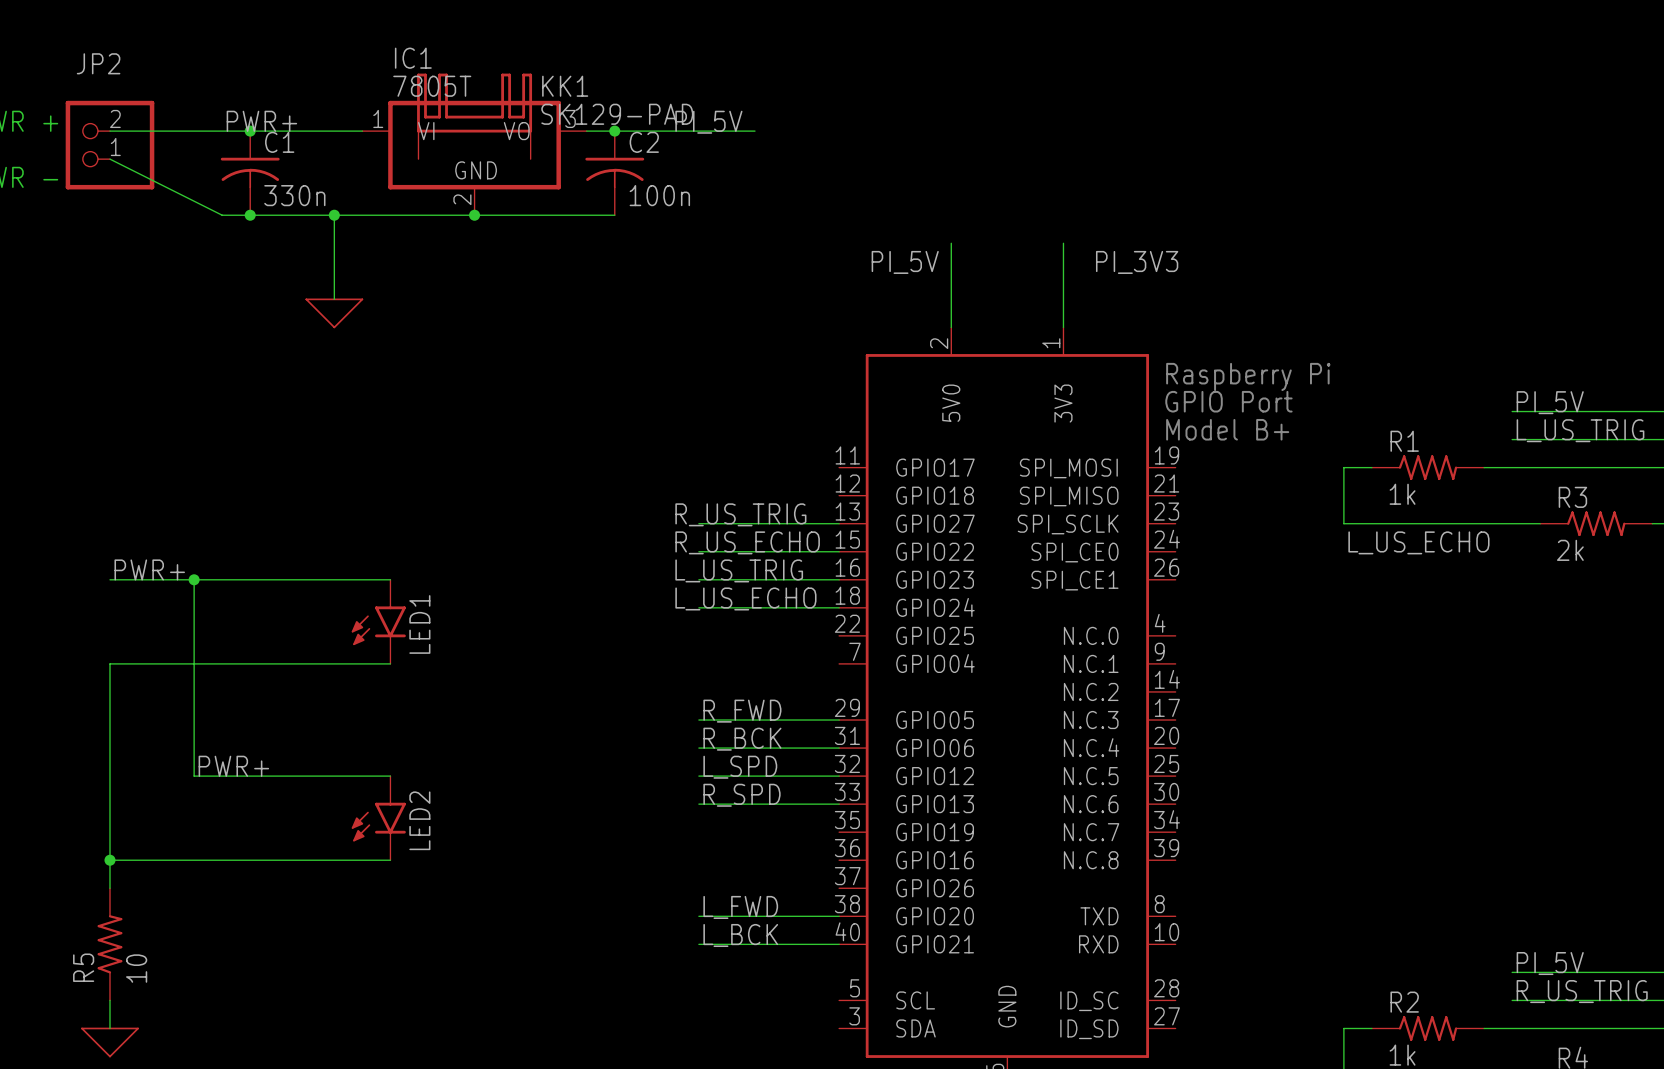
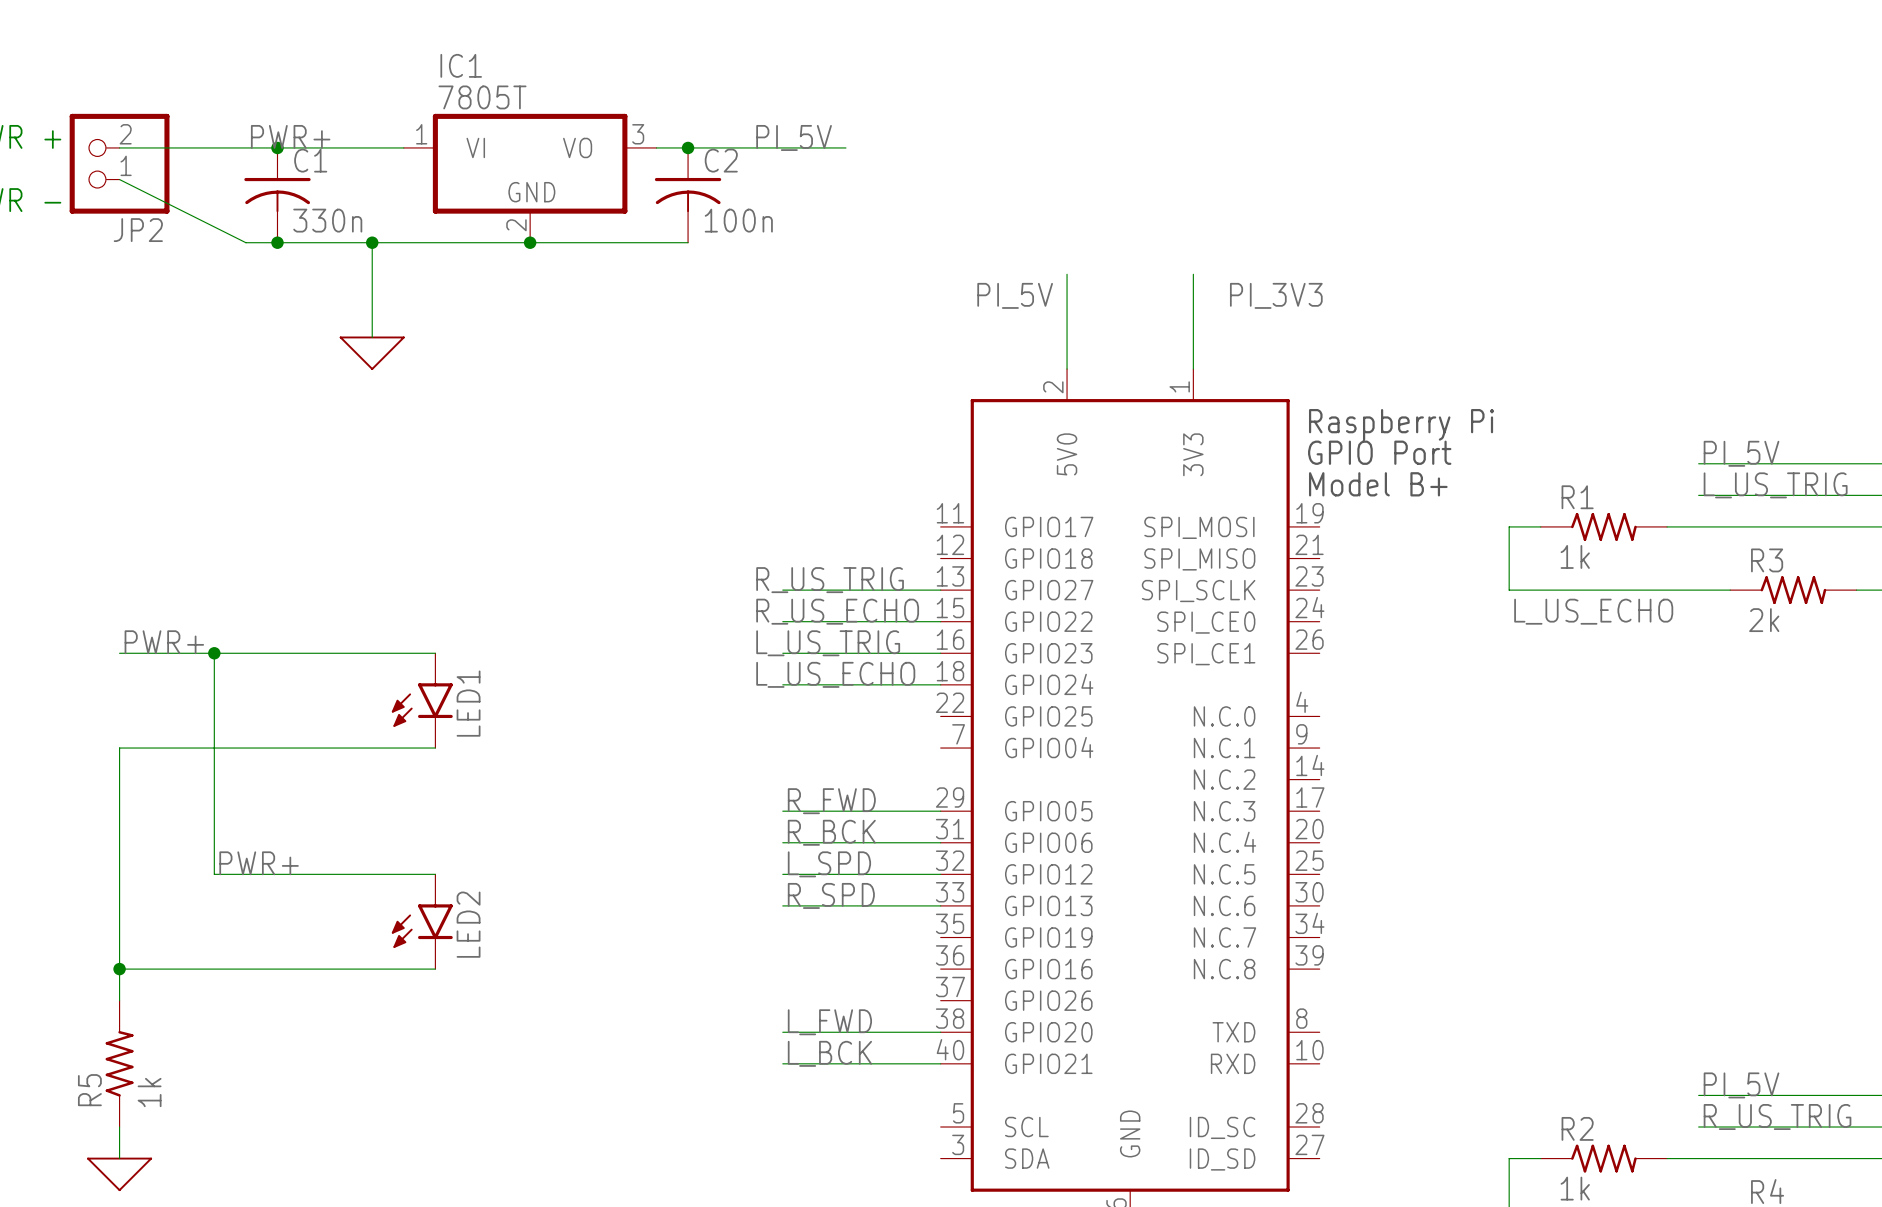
JP2 name position: JP2 (98, 63) -> JP2 (138, 230)
KK1: SK129-PAD (474, 116) -> none
R5 value: 10 (136, 968) -> 1k (149, 1092)

